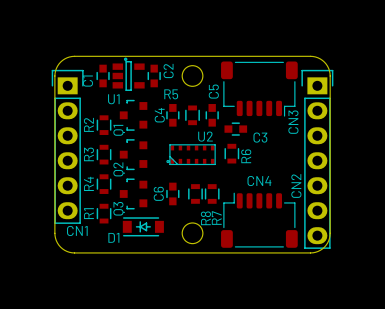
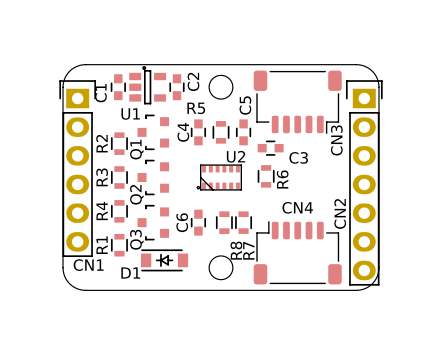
U2 footprint: [166, 144, 216, 166] -> [196, 164, 242, 191]

